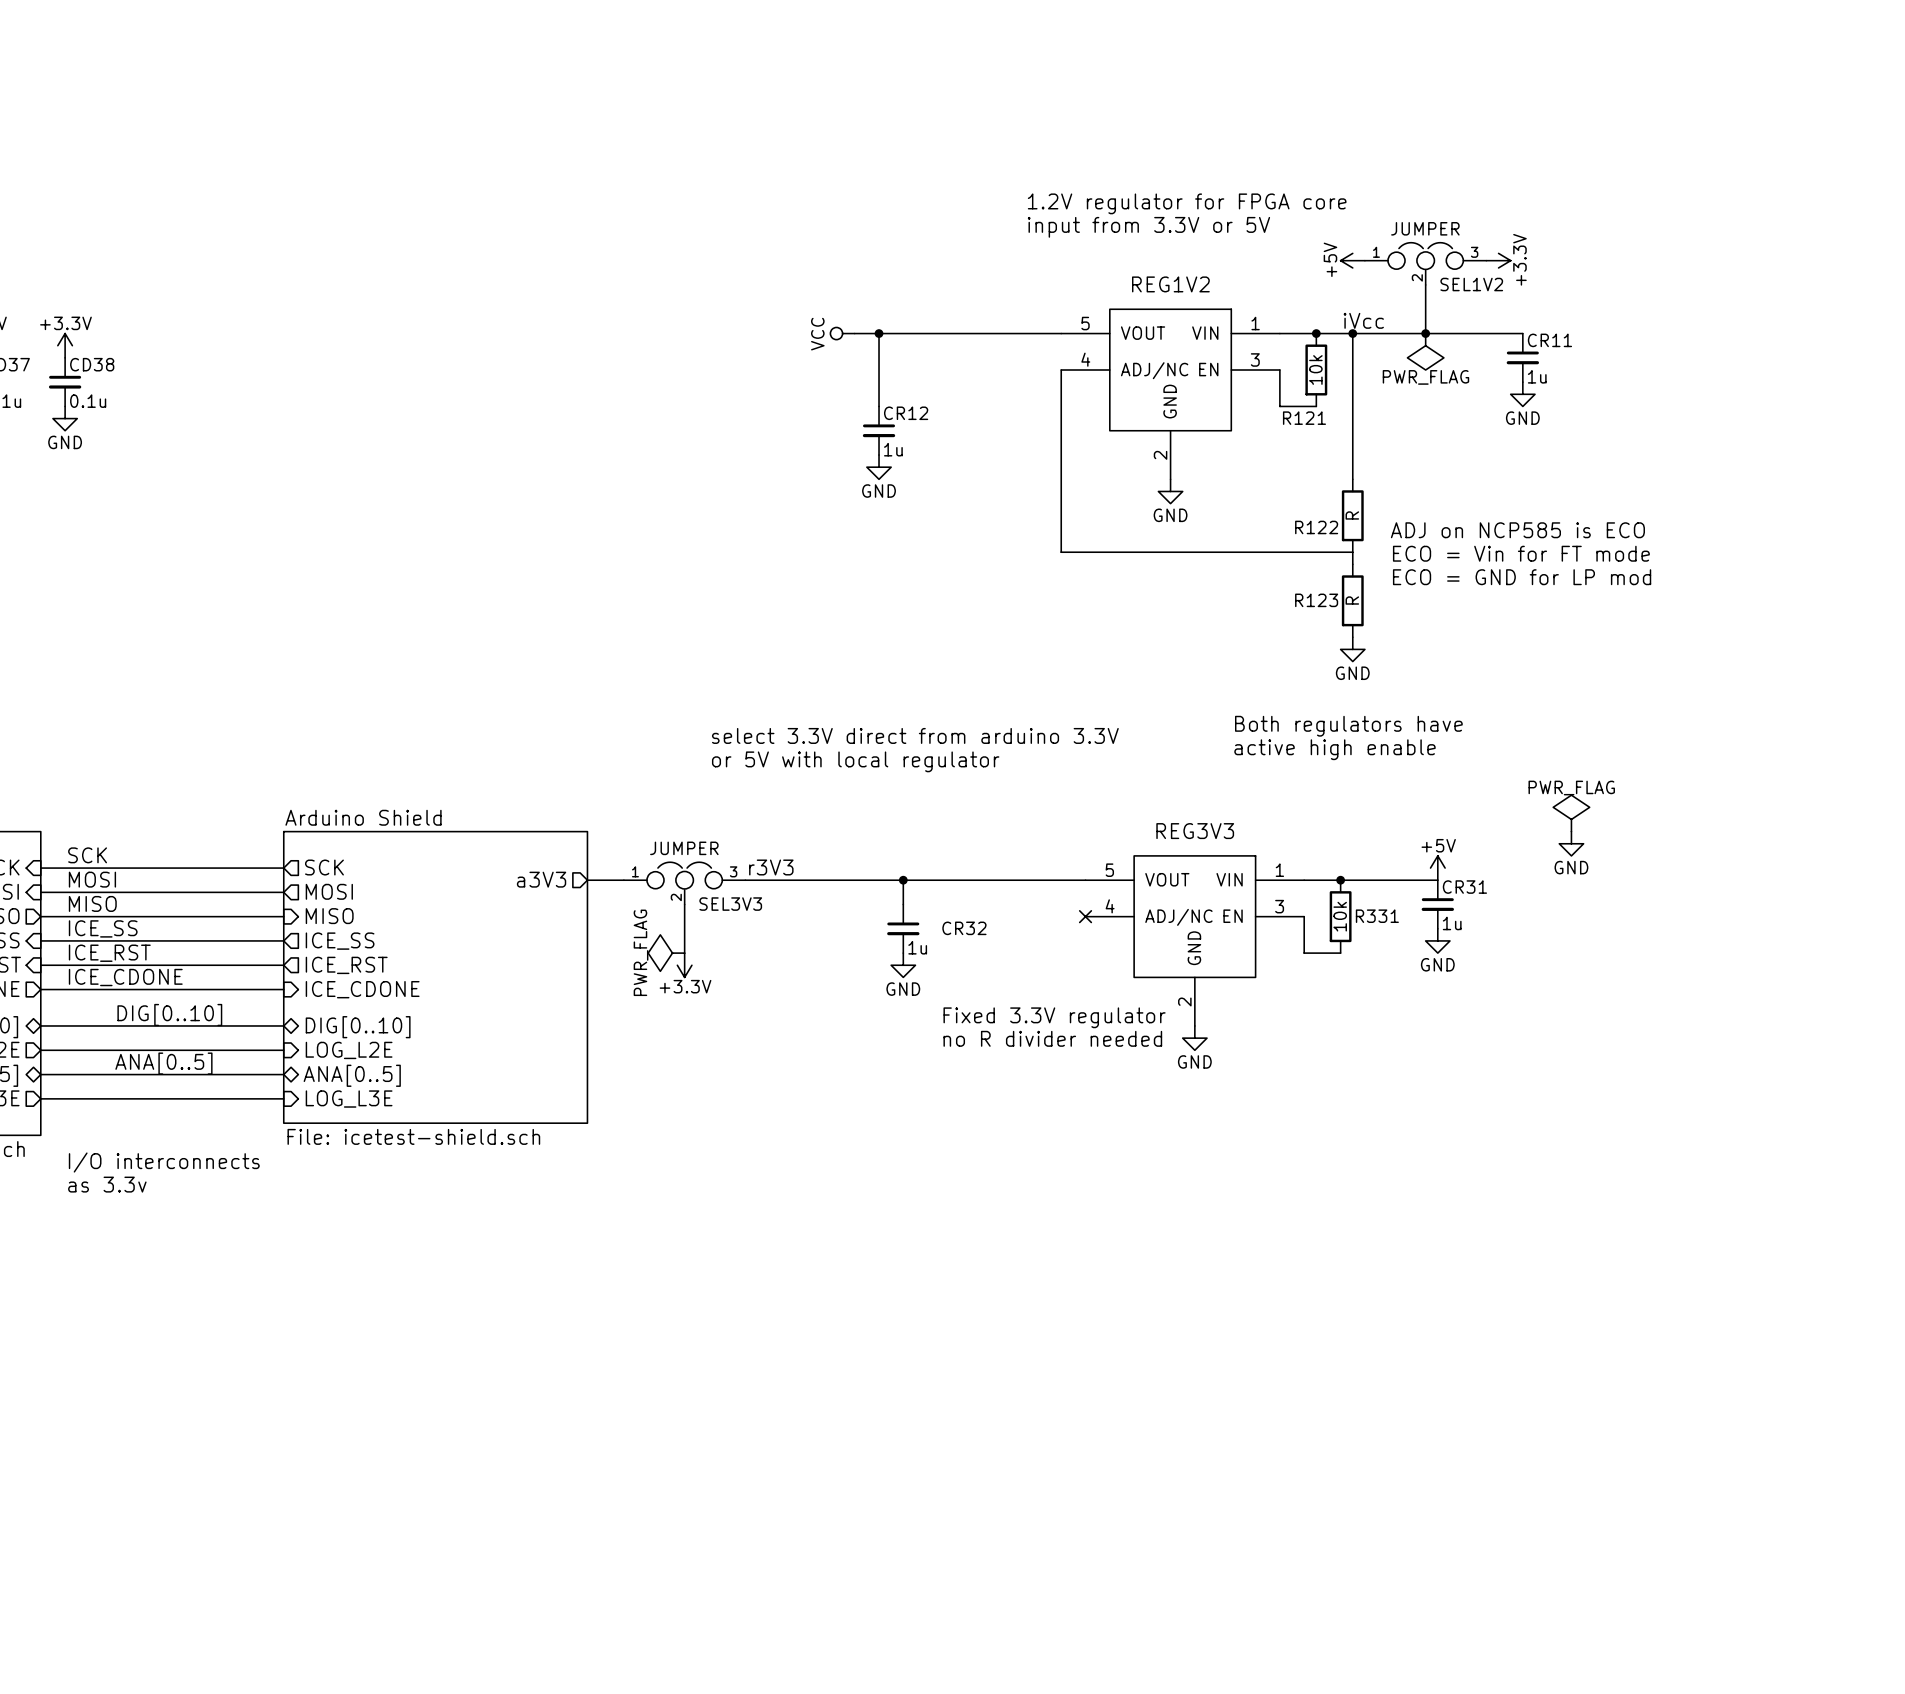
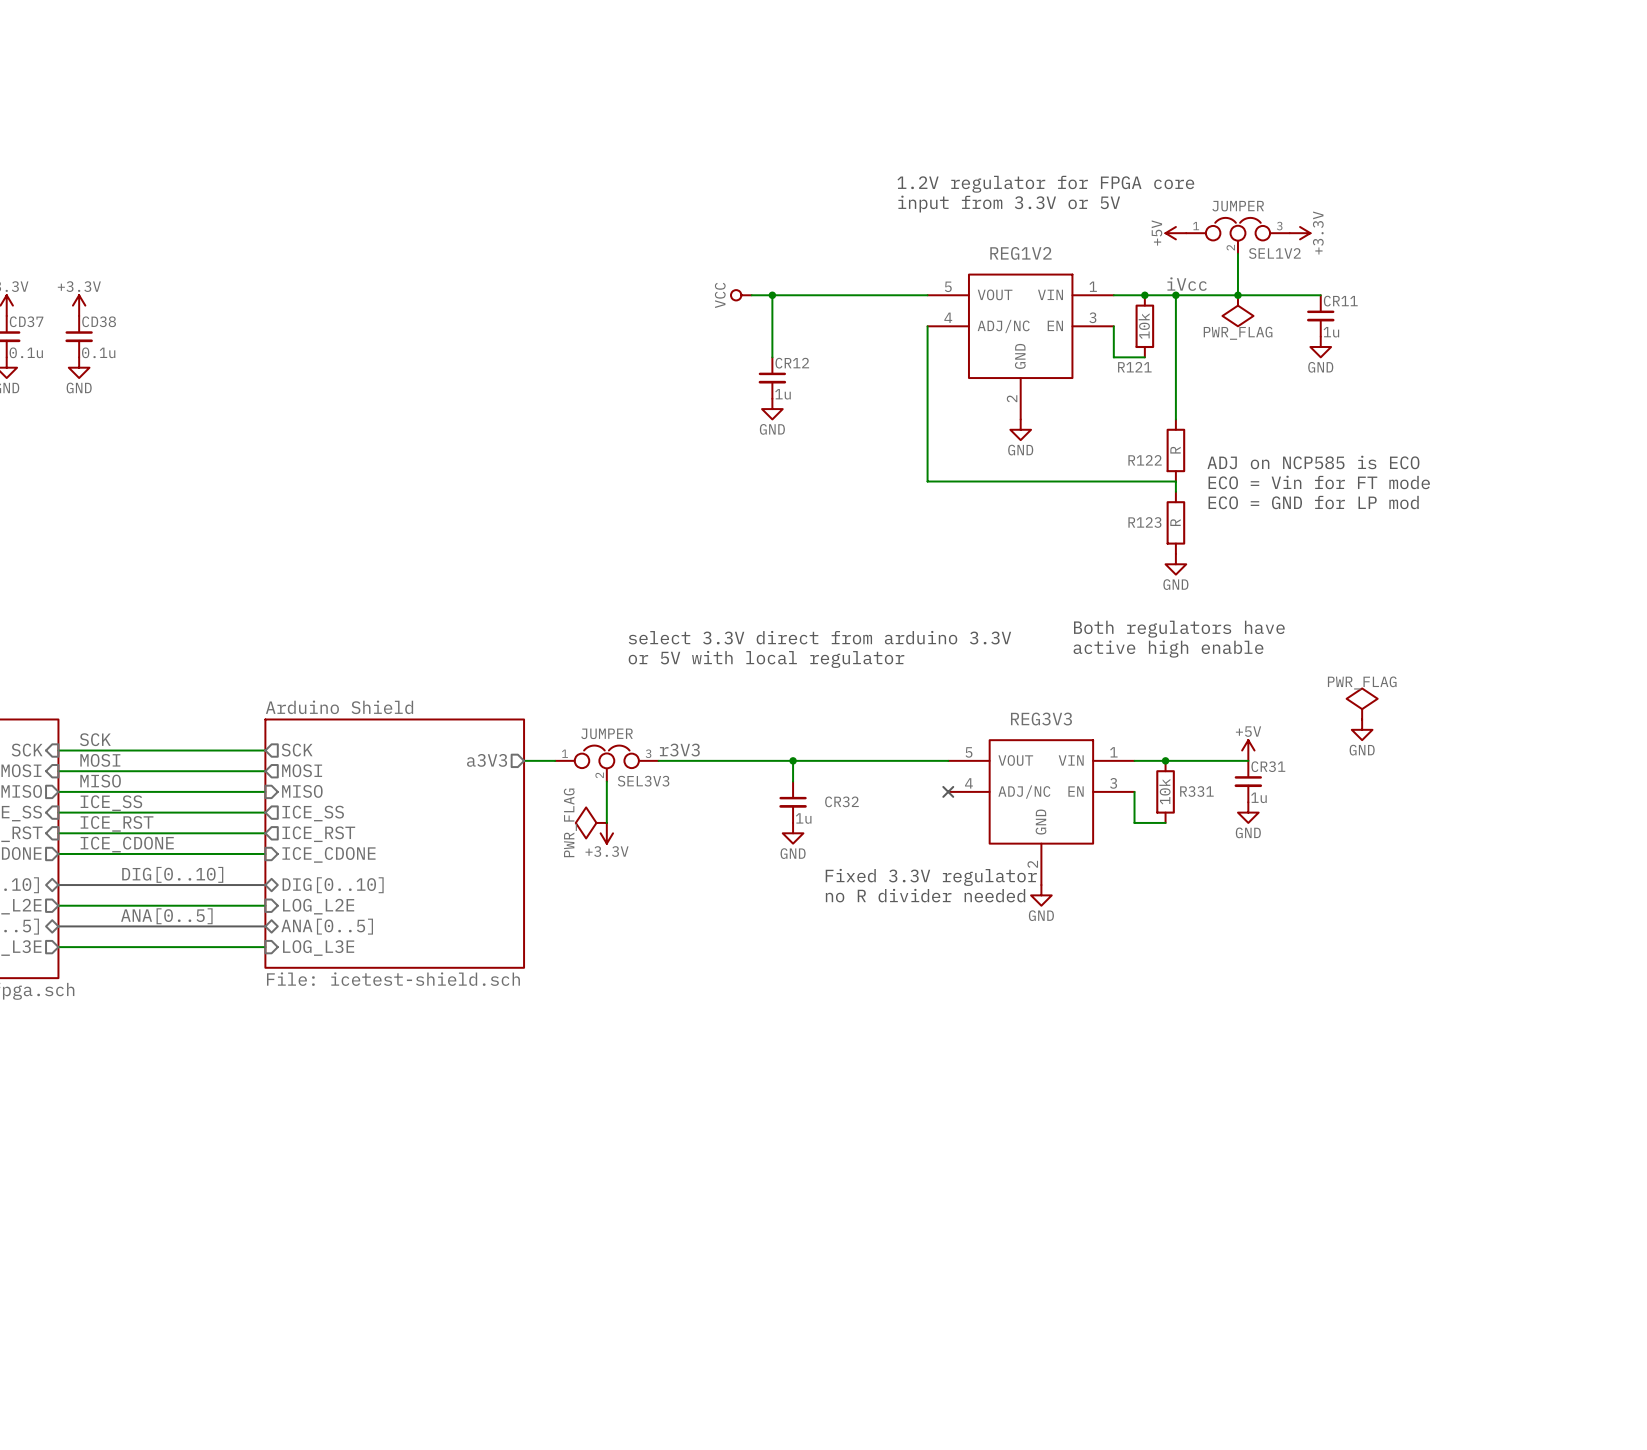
text: I/O interconnects (164, 1162) -> none
text: as 3.3v (107, 1184) -> none

